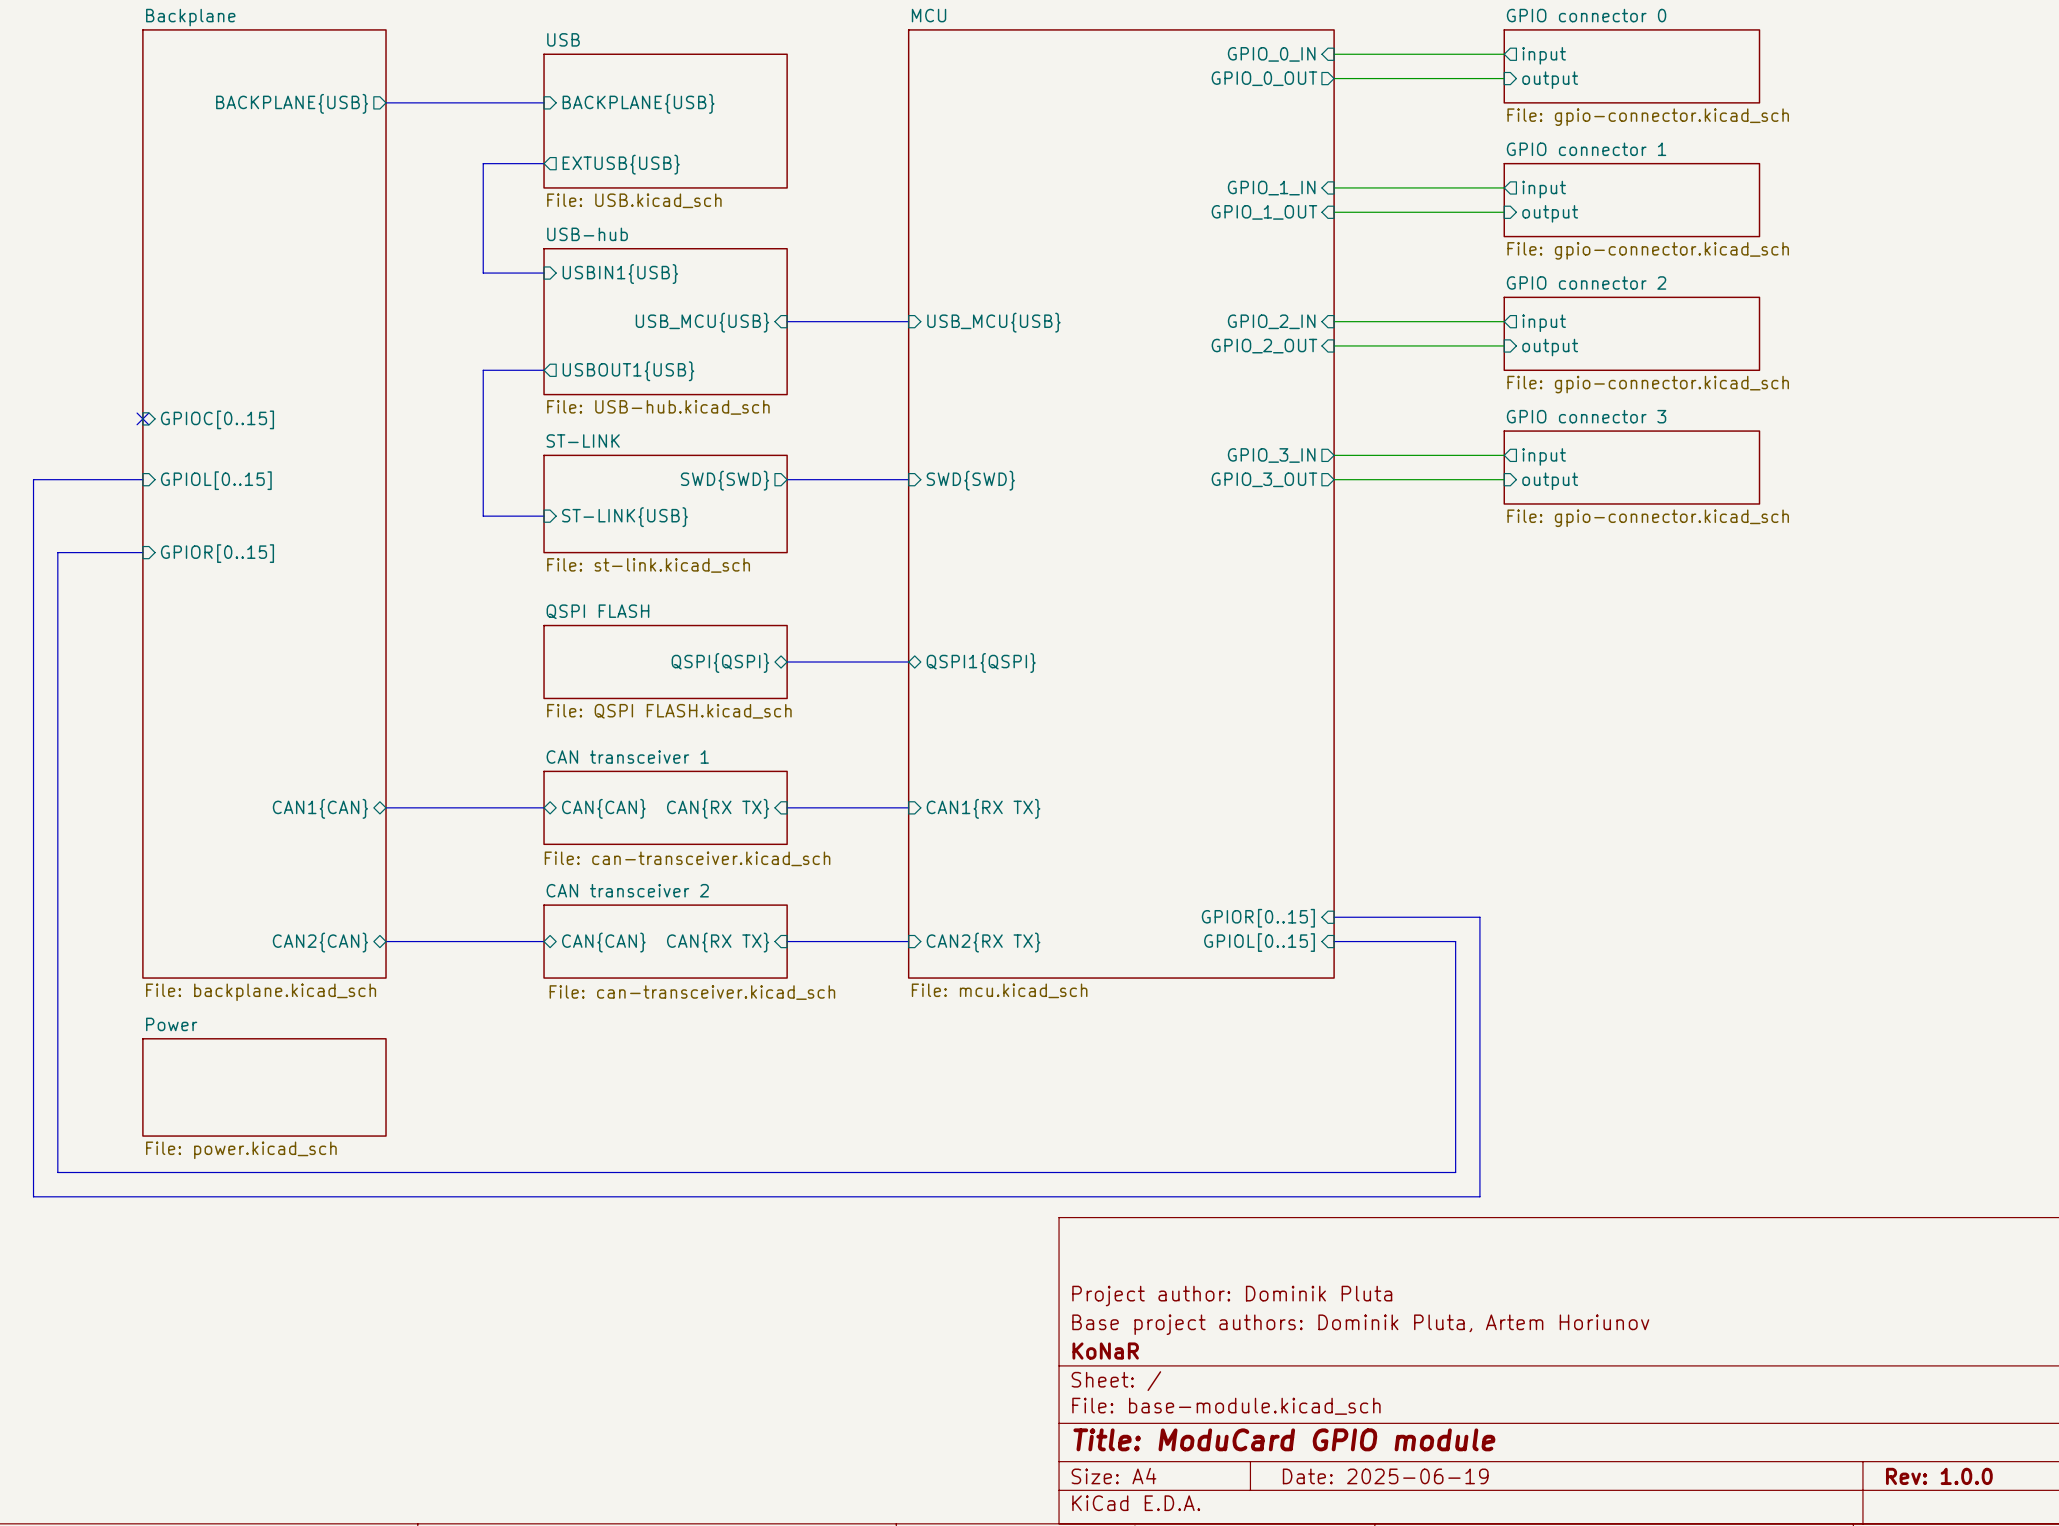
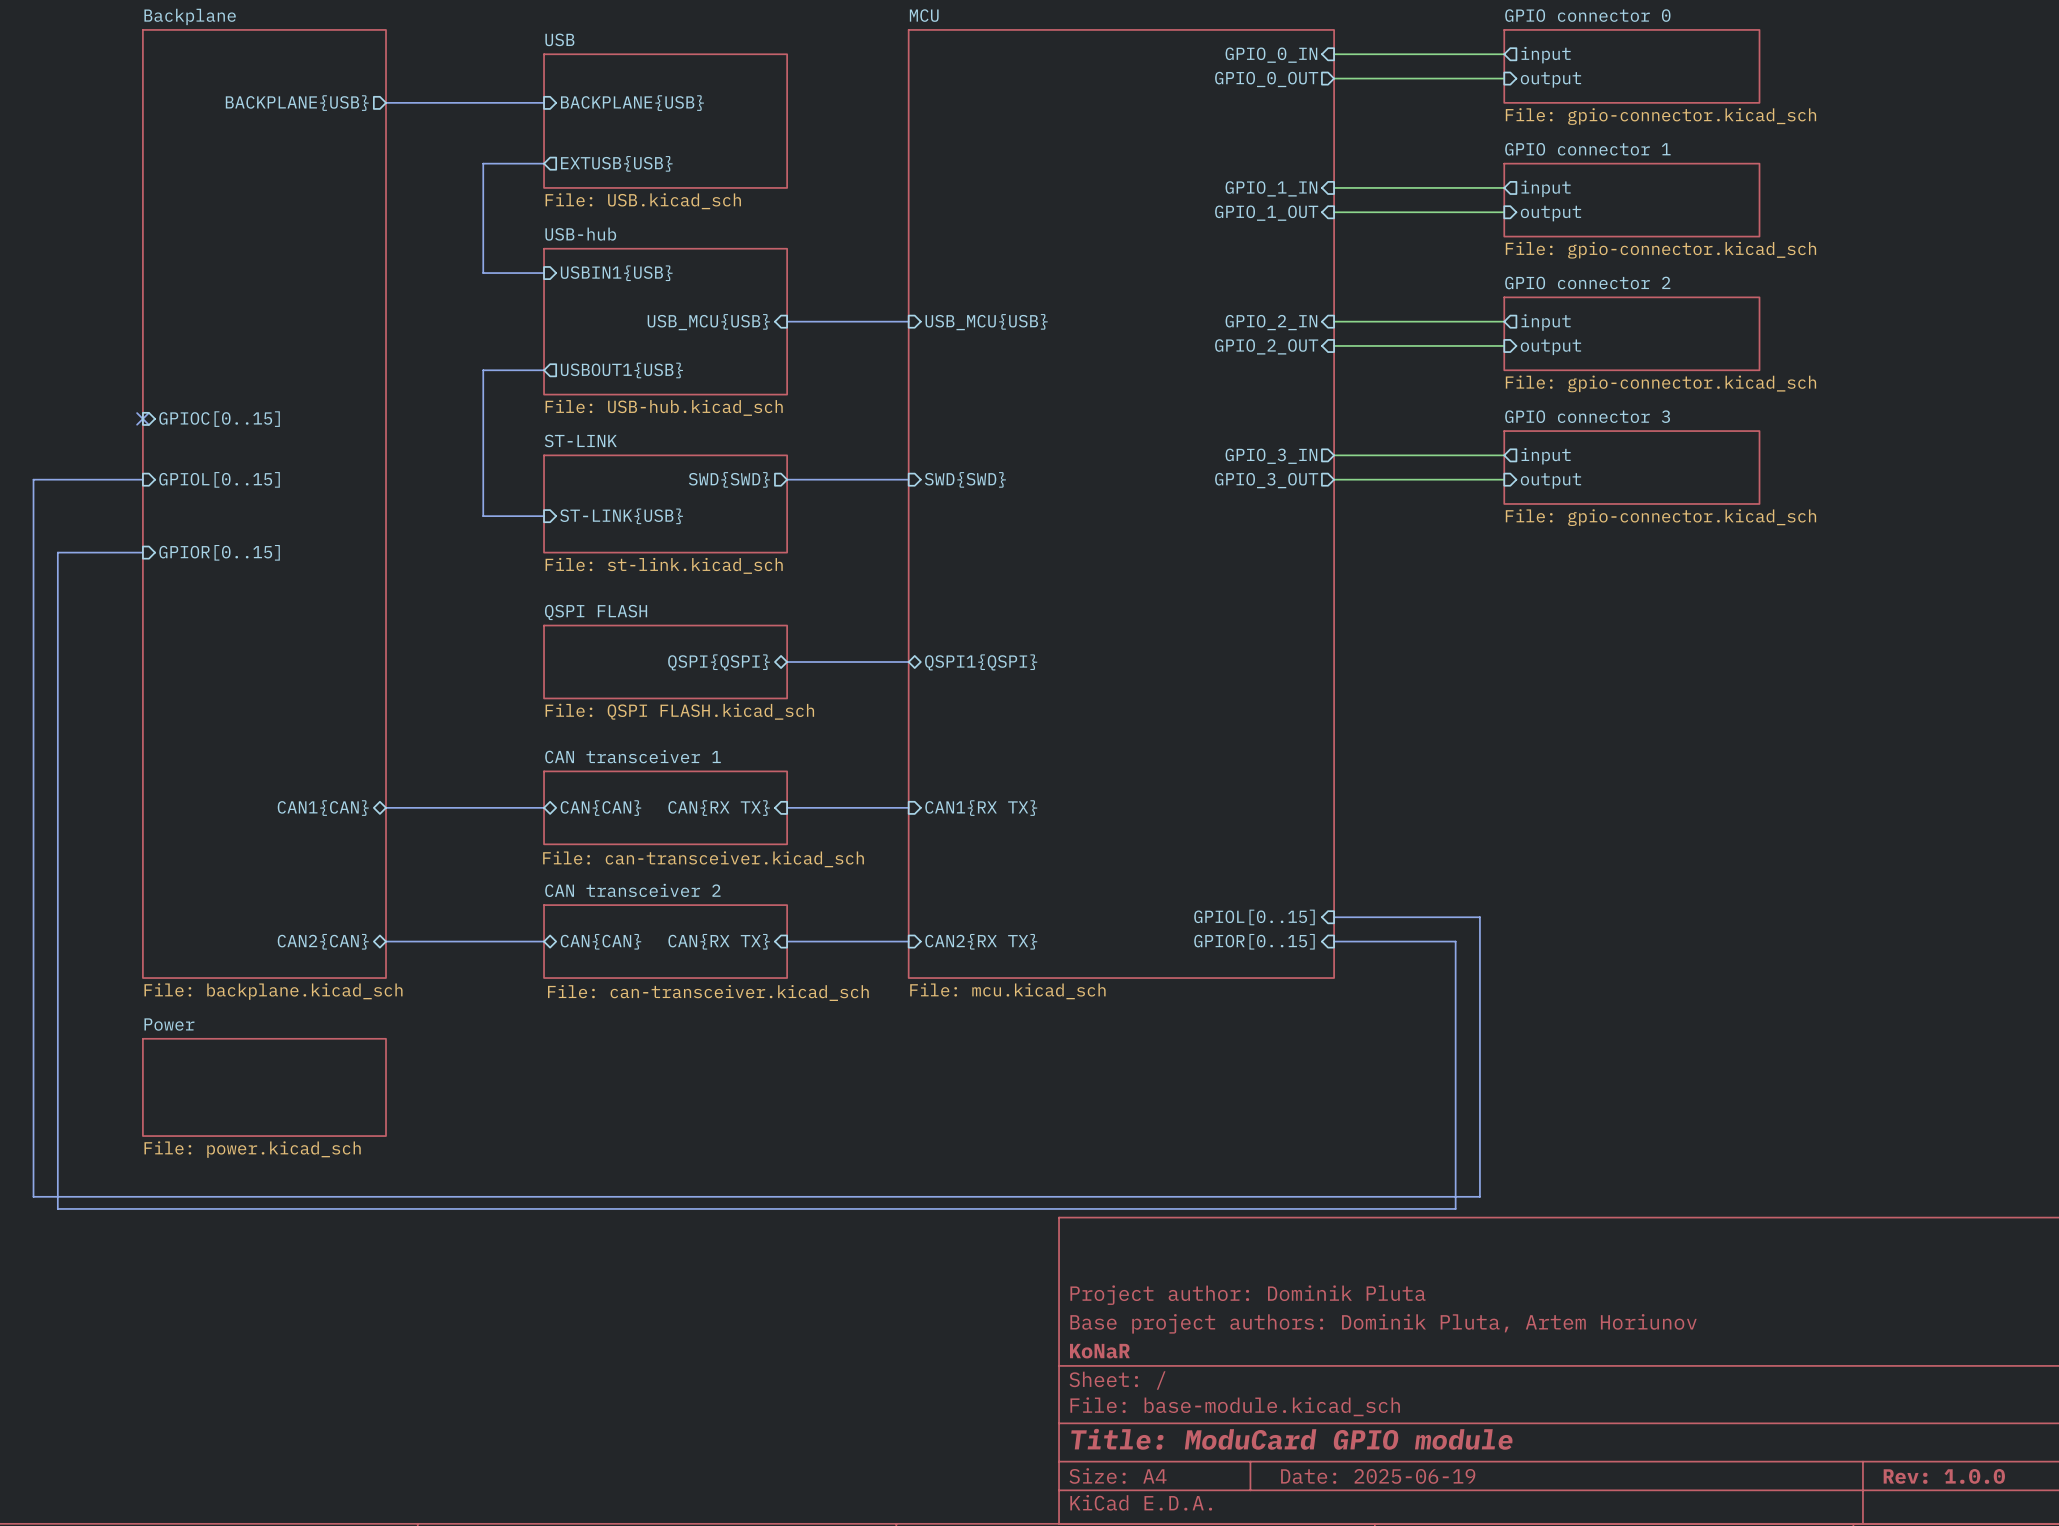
sheet pin: GPIOR[0..15] (1258, 918) -> GPIOL[0..15] (1254, 917)
sheet pin: GPIOL[0..15] (1259, 942) -> GPIOR[0..15] (1254, 941)
bus: (57, 1172) (1455, 1172) -> (57, 1172) (57, 1208) (1455, 1208) (1455, 1172)

